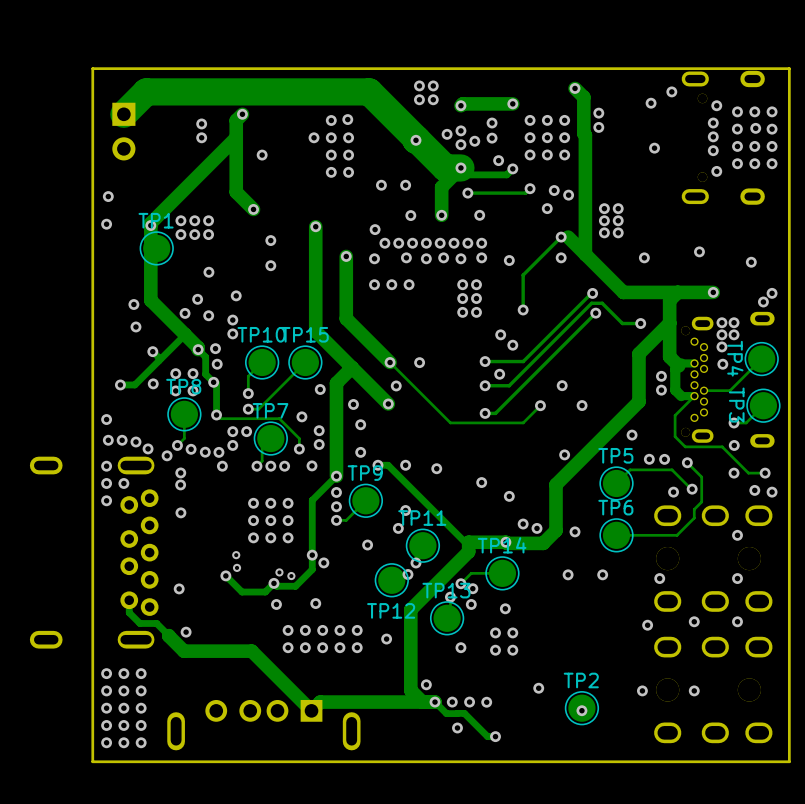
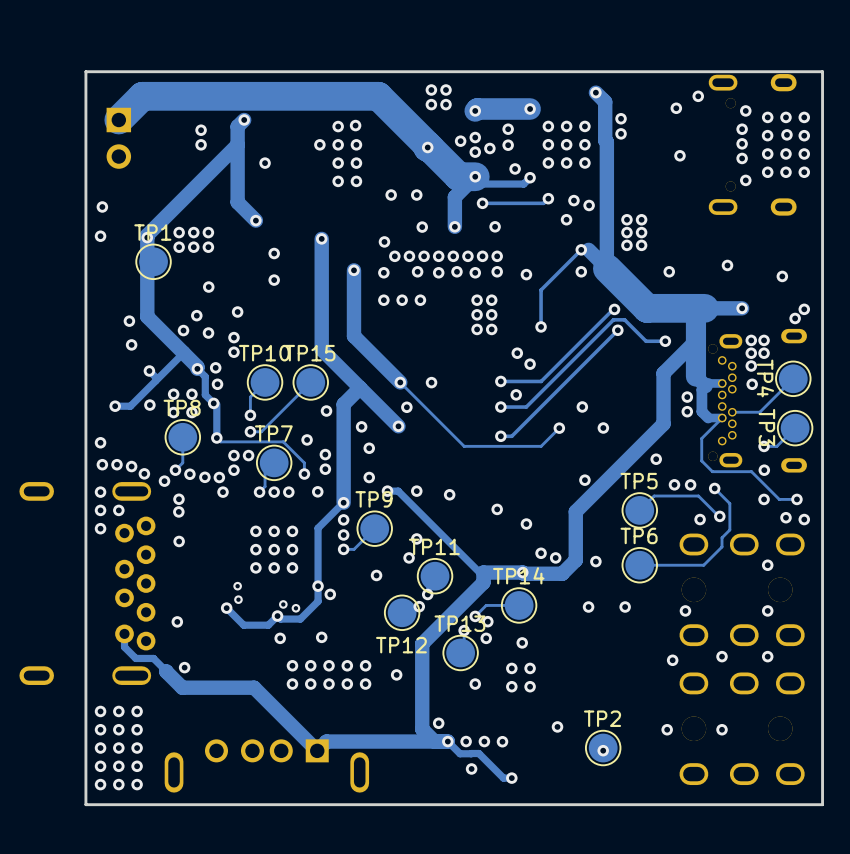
track width: thin (512, 103) (462, 103) (460, 105) -> thick (530, 109) (477, 109) (475, 110)
track width: thin (585, 254) (623, 292) (677, 292) -> thick (607, 268) (647, 308) (704, 308)
track width: thin (669, 300) (669, 356) -> thick (695, 316) (695, 376)

